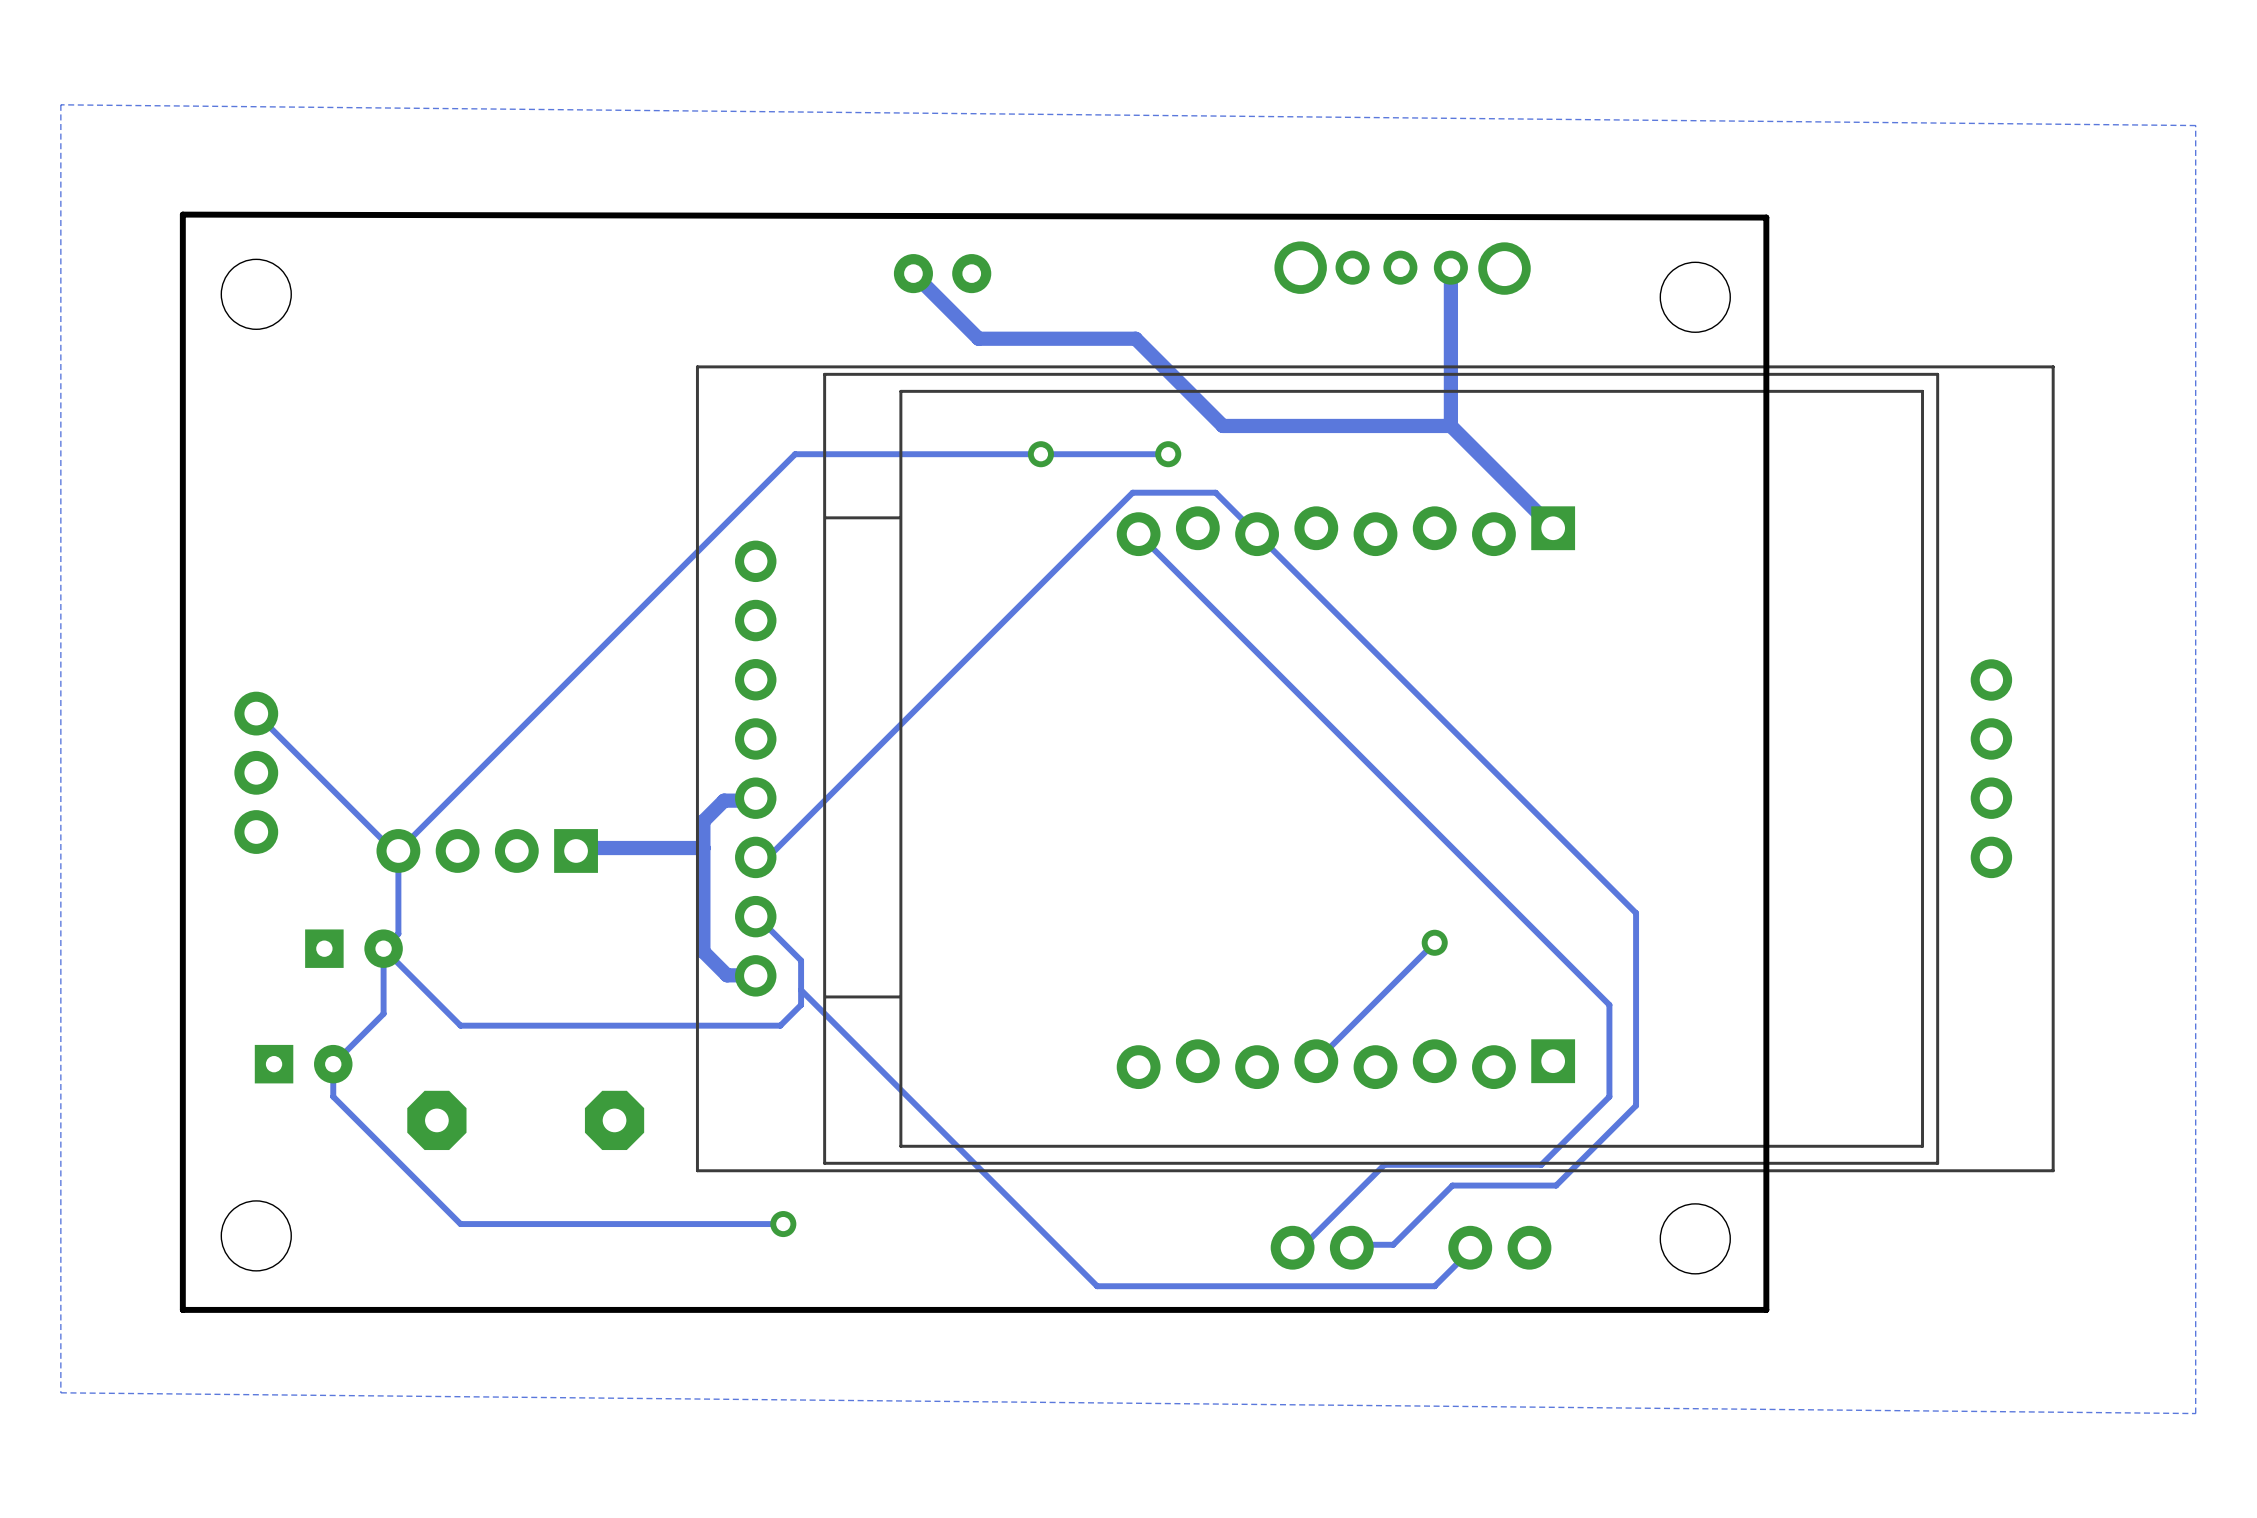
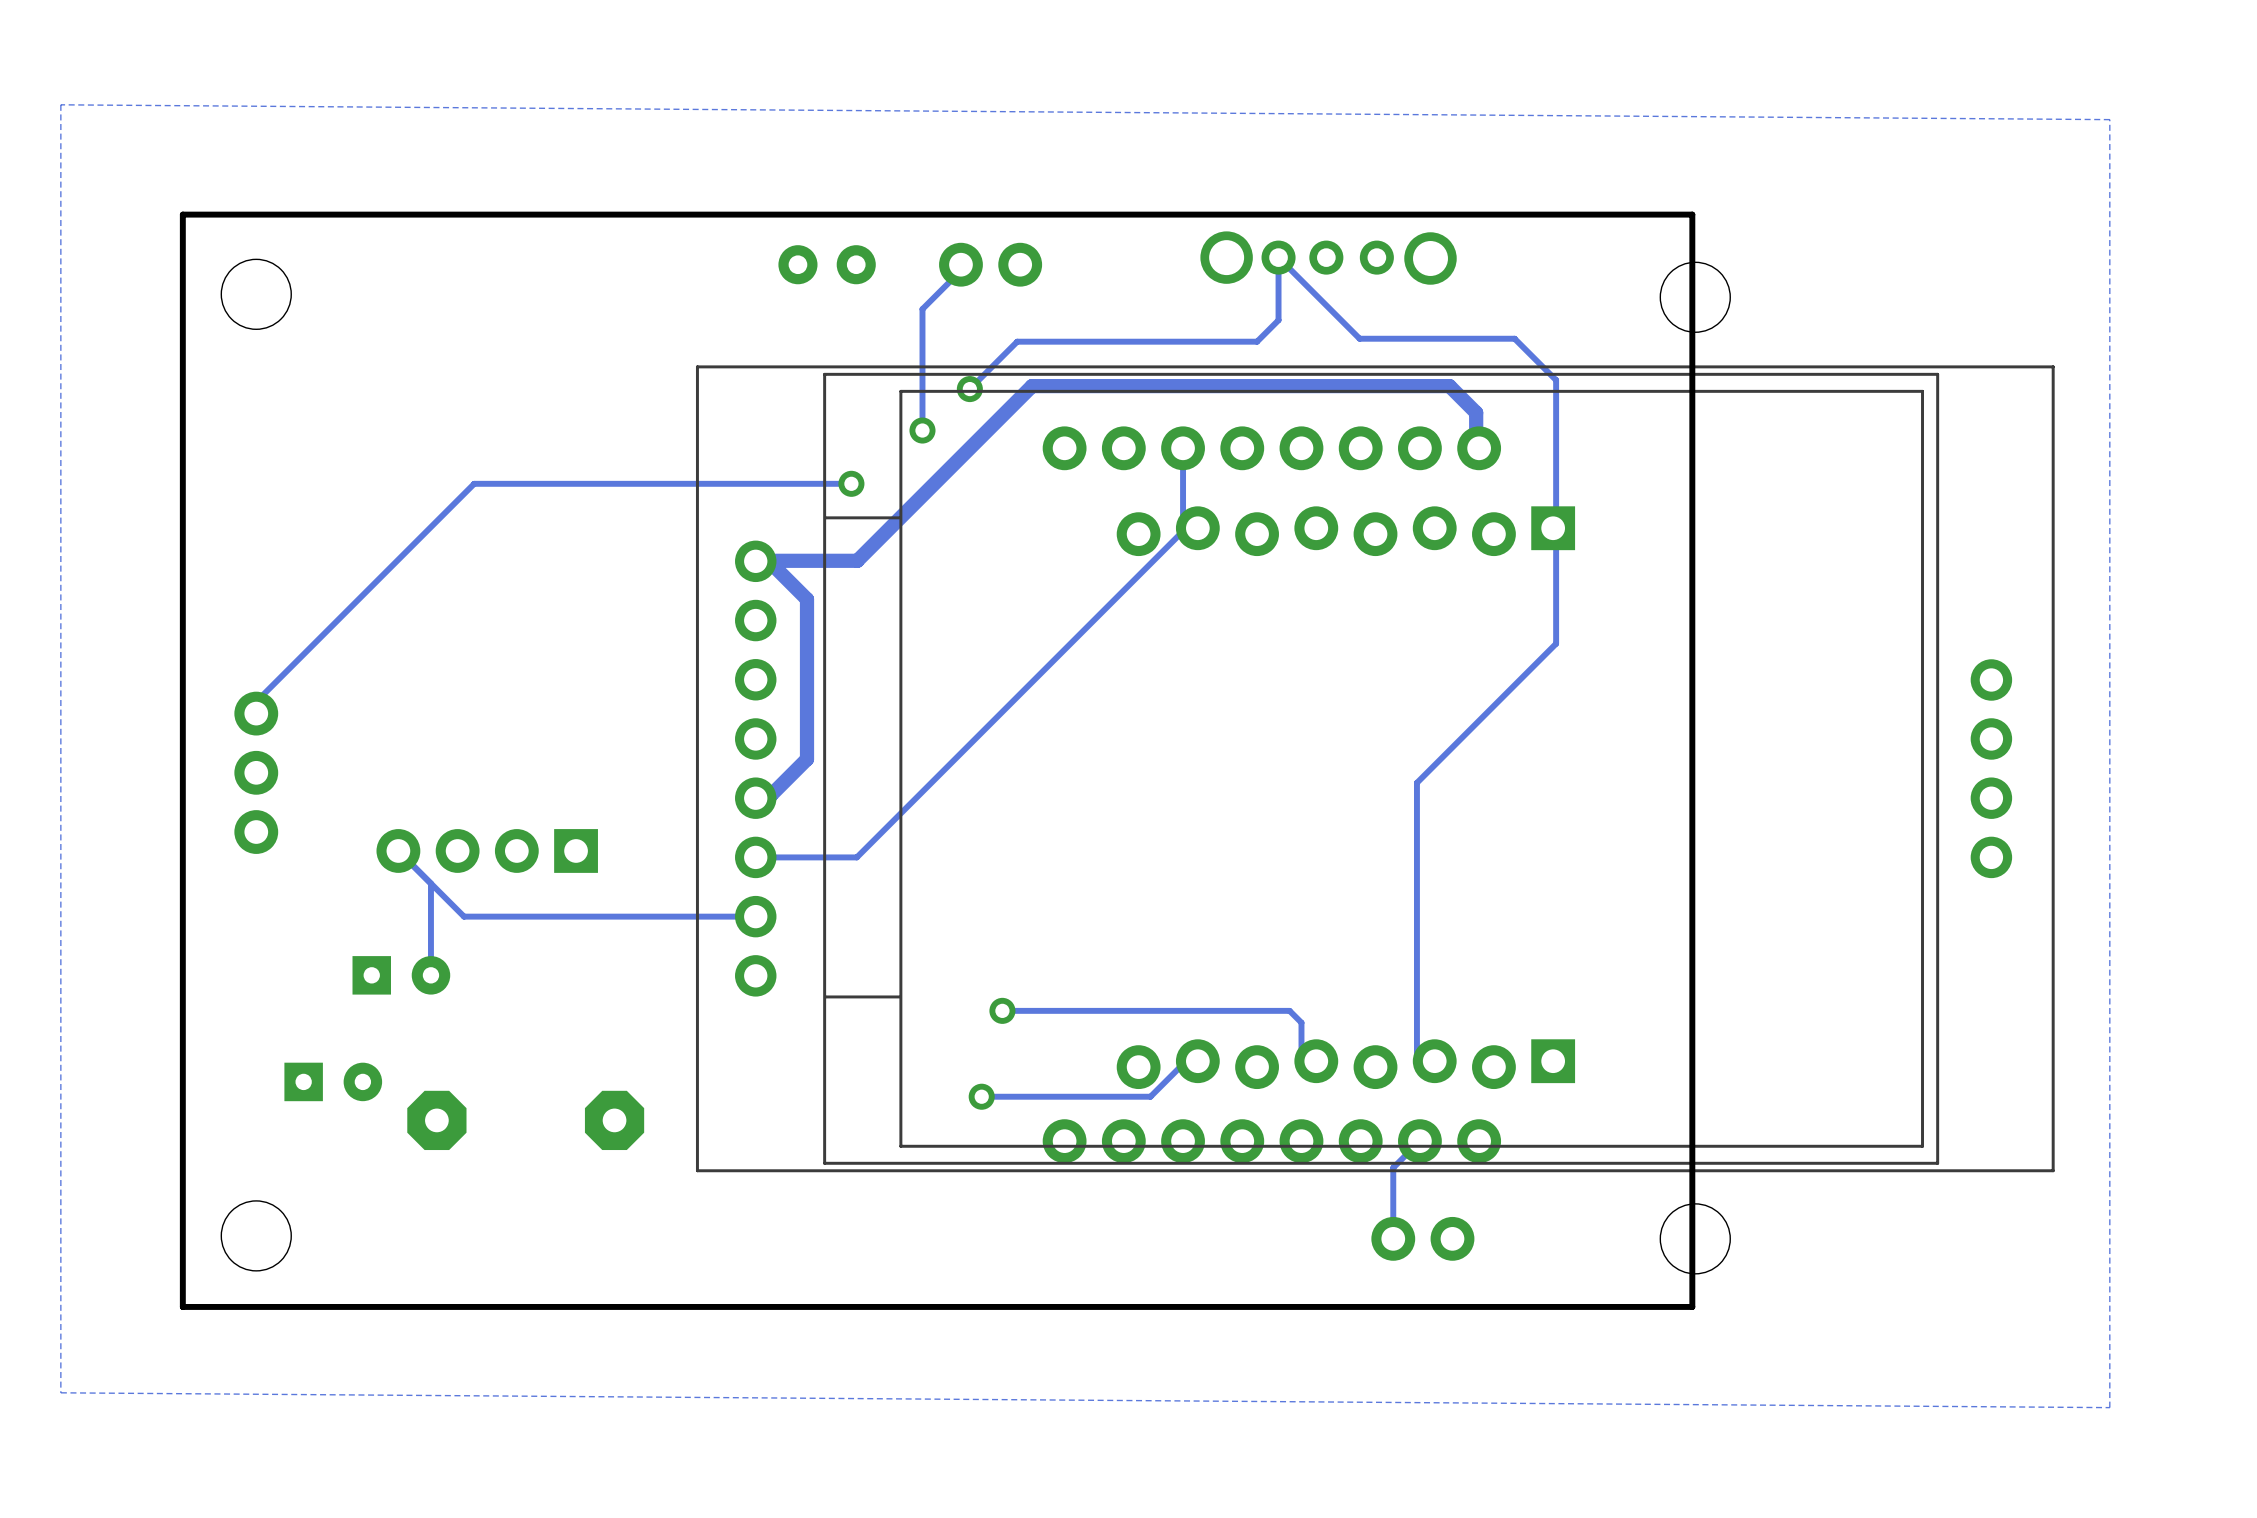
zone outline: (60, 104) (2195, 125) (2195, 1413) (60, 1392) -> (60, 104) (2109, 119) (2109, 1407) (60, 1392)
board edge: (182, 214) (1766, 217) (1766, 1309) (182, 1309) (182, 1306) -> (182, 214) (1692, 214) (1692, 1306) (182, 1306)
track: none -> (960, 264) (960, 270) (922, 309) (922, 430)
part: none -> (990, 264)
track: (1450, 267) (1450, 425) -> none
part position: (1402, 268) -> (1328, 258)
track: (913, 273) (978, 338) (1135, 338) (1222, 425) (1450, 425) -> none
part position: (942, 273) -> (827, 264)
track: none -> (969, 389) (1017, 341) (1257, 341) (1278, 320) (1278, 257) (1359, 338) (1514, 338) (1556, 380) (1556, 643) (1416, 782) (1416, 1061) (1419, 1064)
via: none -> (969, 389)
track: (1450, 425) (1553, 528) -> none
via: none -> (922, 430)
part: none -> (1271, 448)
track: none -> (1479, 448) (1476, 445) (1476, 412) (1449, 386) (1032, 386) (857, 560) (755, 561)
via: (1040, 454) -> none
track: (1168, 454) (795, 454) (398, 850) (398, 933) (383, 948) -> none
via: (1168, 454) -> none
track: none -> (851, 483) (474, 483) (256, 701)
via: none -> (851, 483)
track: (1138, 534) (1609, 1004) (1609, 1096) (1541, 1164) (1384, 1164) (1304, 1244) (1292, 1244) (1292, 1247) -> none
track: (256, 713) (387, 845) (404, 845) -> none
track: (755, 798) (753, 800) (724, 800) (703, 821) (703, 951) (727, 975) (755, 975) -> (755, 798) (759, 794) (771, 794) (807, 759) (807, 599) (768, 560)
track: (703, 848) (576, 848) (576, 850) -> none
track: (755, 857) (759, 853) (771, 853) (1132, 492) (1215, 492) (1636, 913) (1636, 1105) (1556, 1185) (1452, 1185) (1393, 1244) (1351, 1244) (1351, 1247) -> (755, 857) (856, 857) (1183, 531) (1183, 448)
track: none -> (430, 883) (430, 975)
track: (755, 916) (801, 960) (801, 1004) (780, 1025) (460, 1025) (383, 948) -> (755, 916) (464, 916) (398, 850)
track: (1434, 942) (1316, 1061) -> none
via: (1434, 942) -> none
part position: (353, 948) -> (401, 975)
track: (383, 948) (383, 1013) (333, 1064) (333, 1096) (460, 1224) (783, 1224) -> none
track: (801, 990) (1097, 1286) (1434, 1286) (1470, 1250) (1470, 1247) -> none
track: none -> (1002, 1010) (1289, 1010) (1301, 1022) (1301, 1064)
via: none -> (1002, 1010)
part position: (303, 1064) -> (333, 1081)
track: none -> (1183, 1064) (1150, 1096) (981, 1096)
via: none -> (981, 1096)
part: none -> (1271, 1141)
track: none -> (1419, 1141) (1393, 1167) (1393, 1238)
via: (783, 1224) -> none
part: none -> (1422, 1238)
part: (1322, 1247) -> none
part: (1499, 1247) -> none

